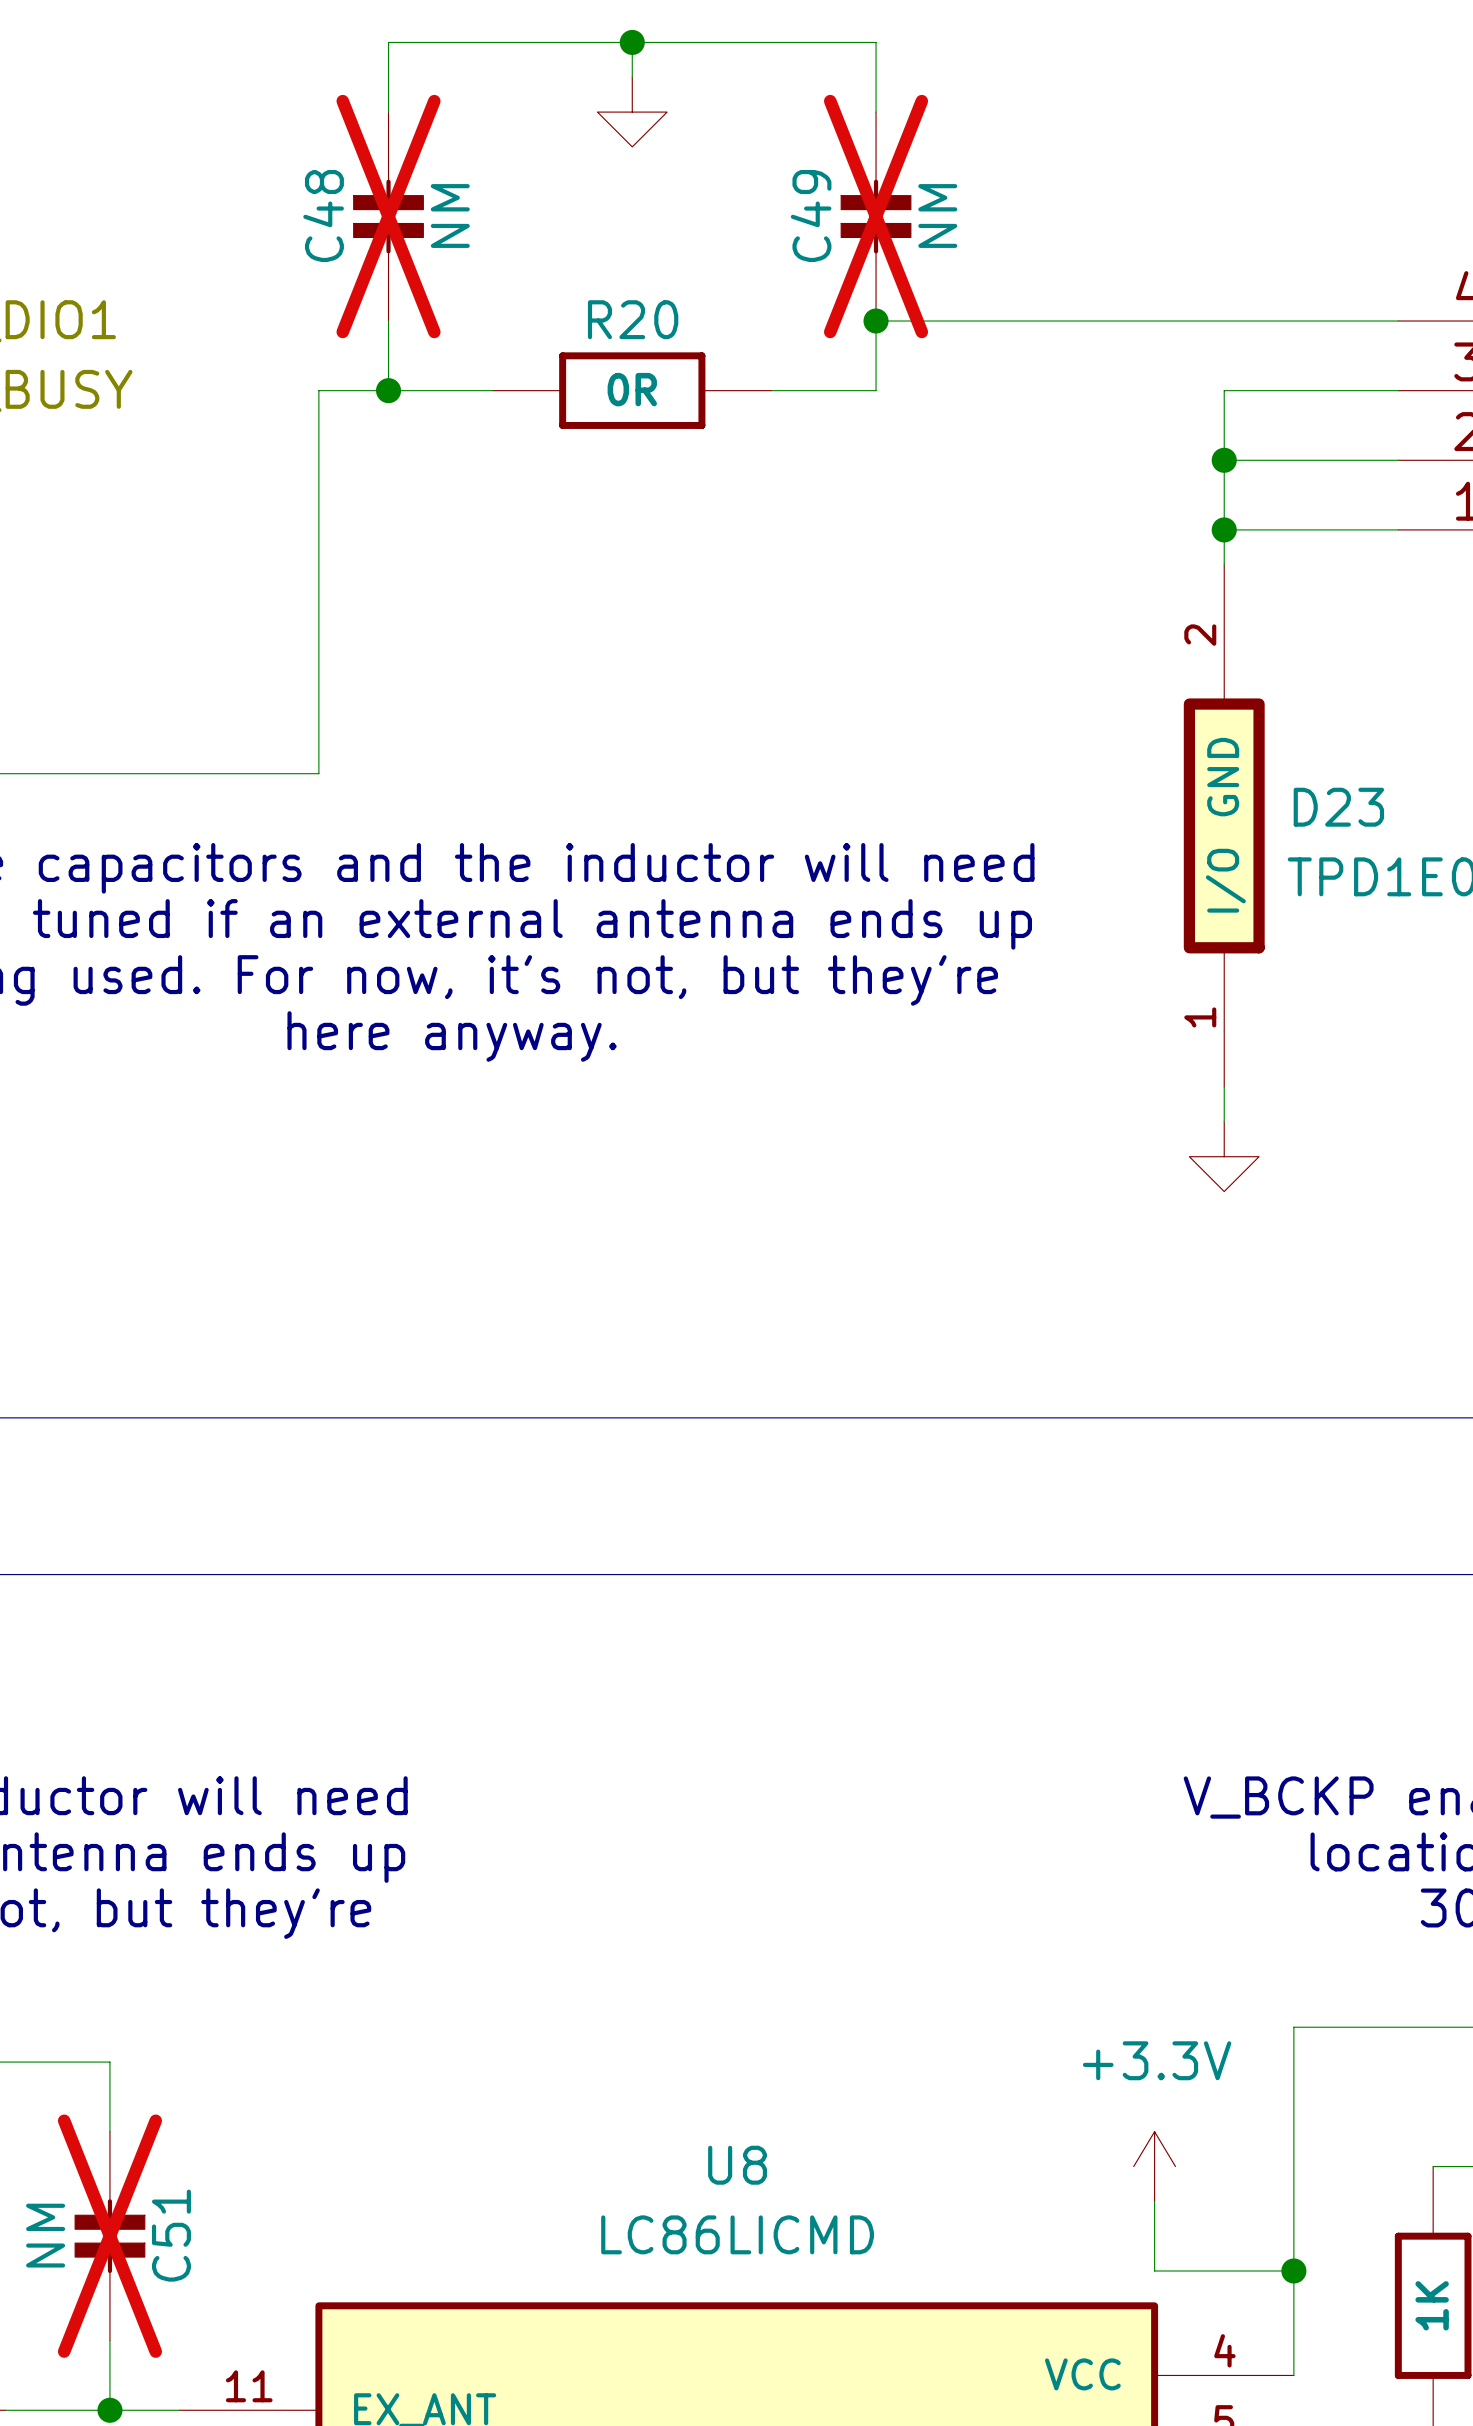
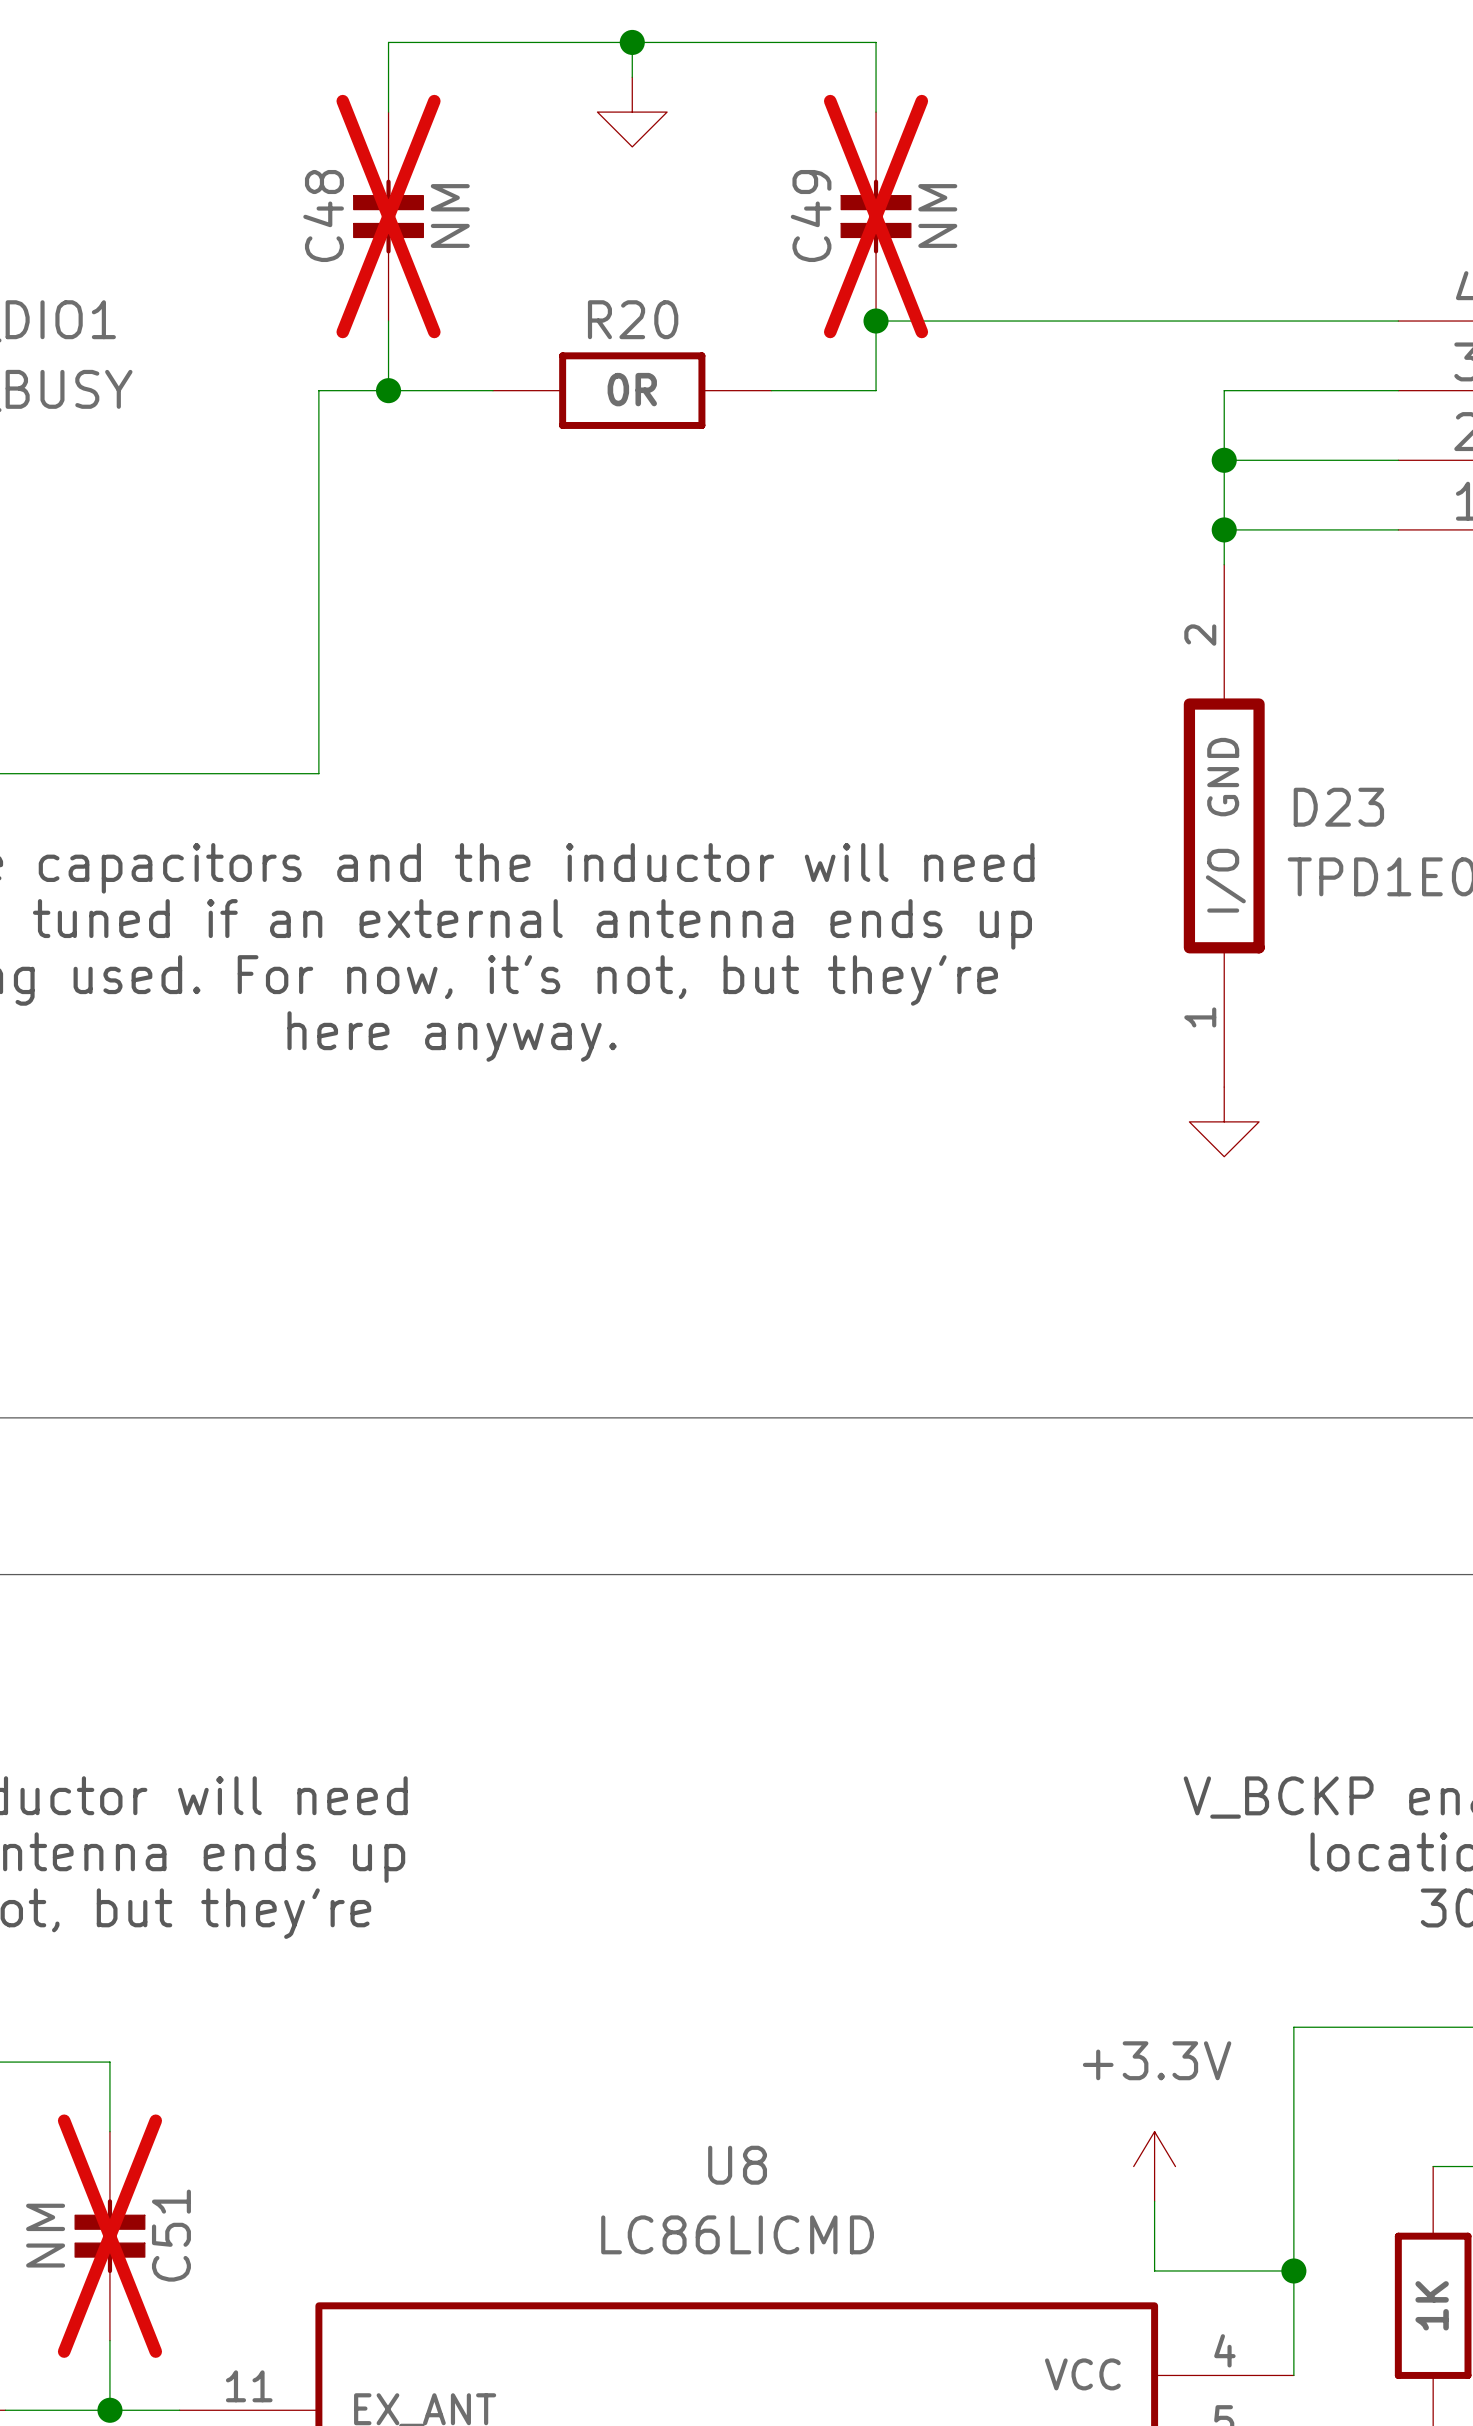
power symbol position: (1224, 1156) -> (1224, 1121)

